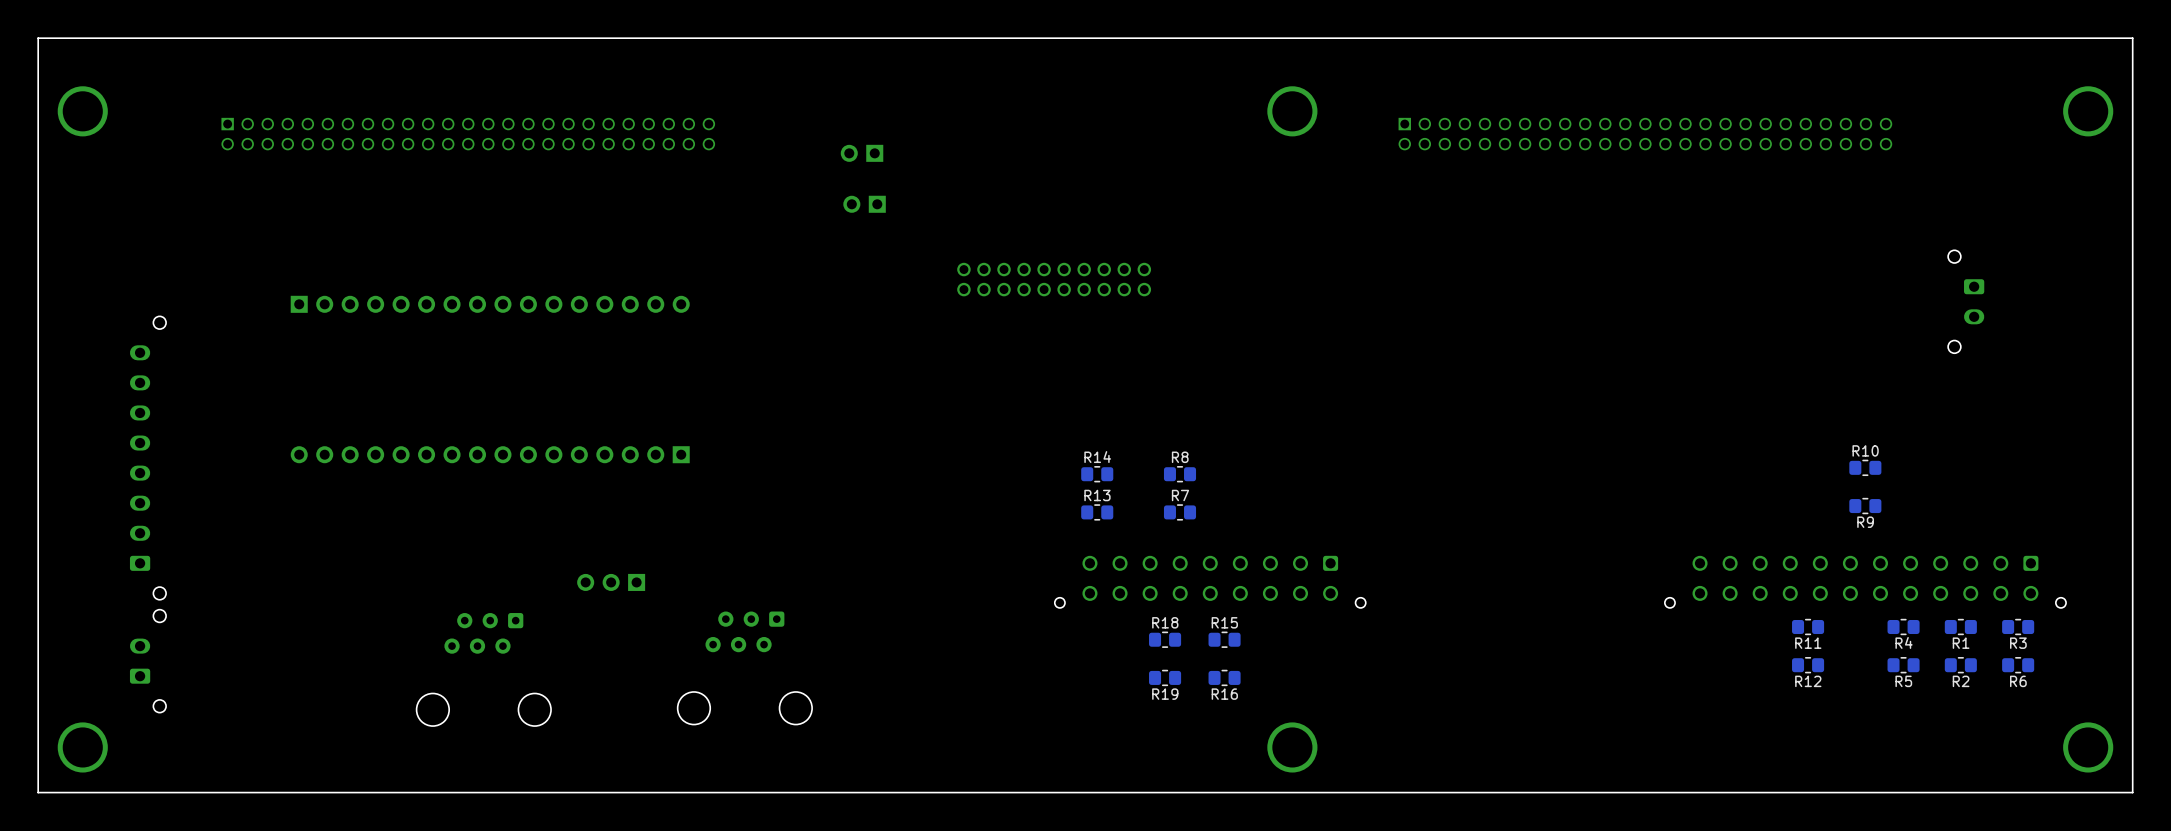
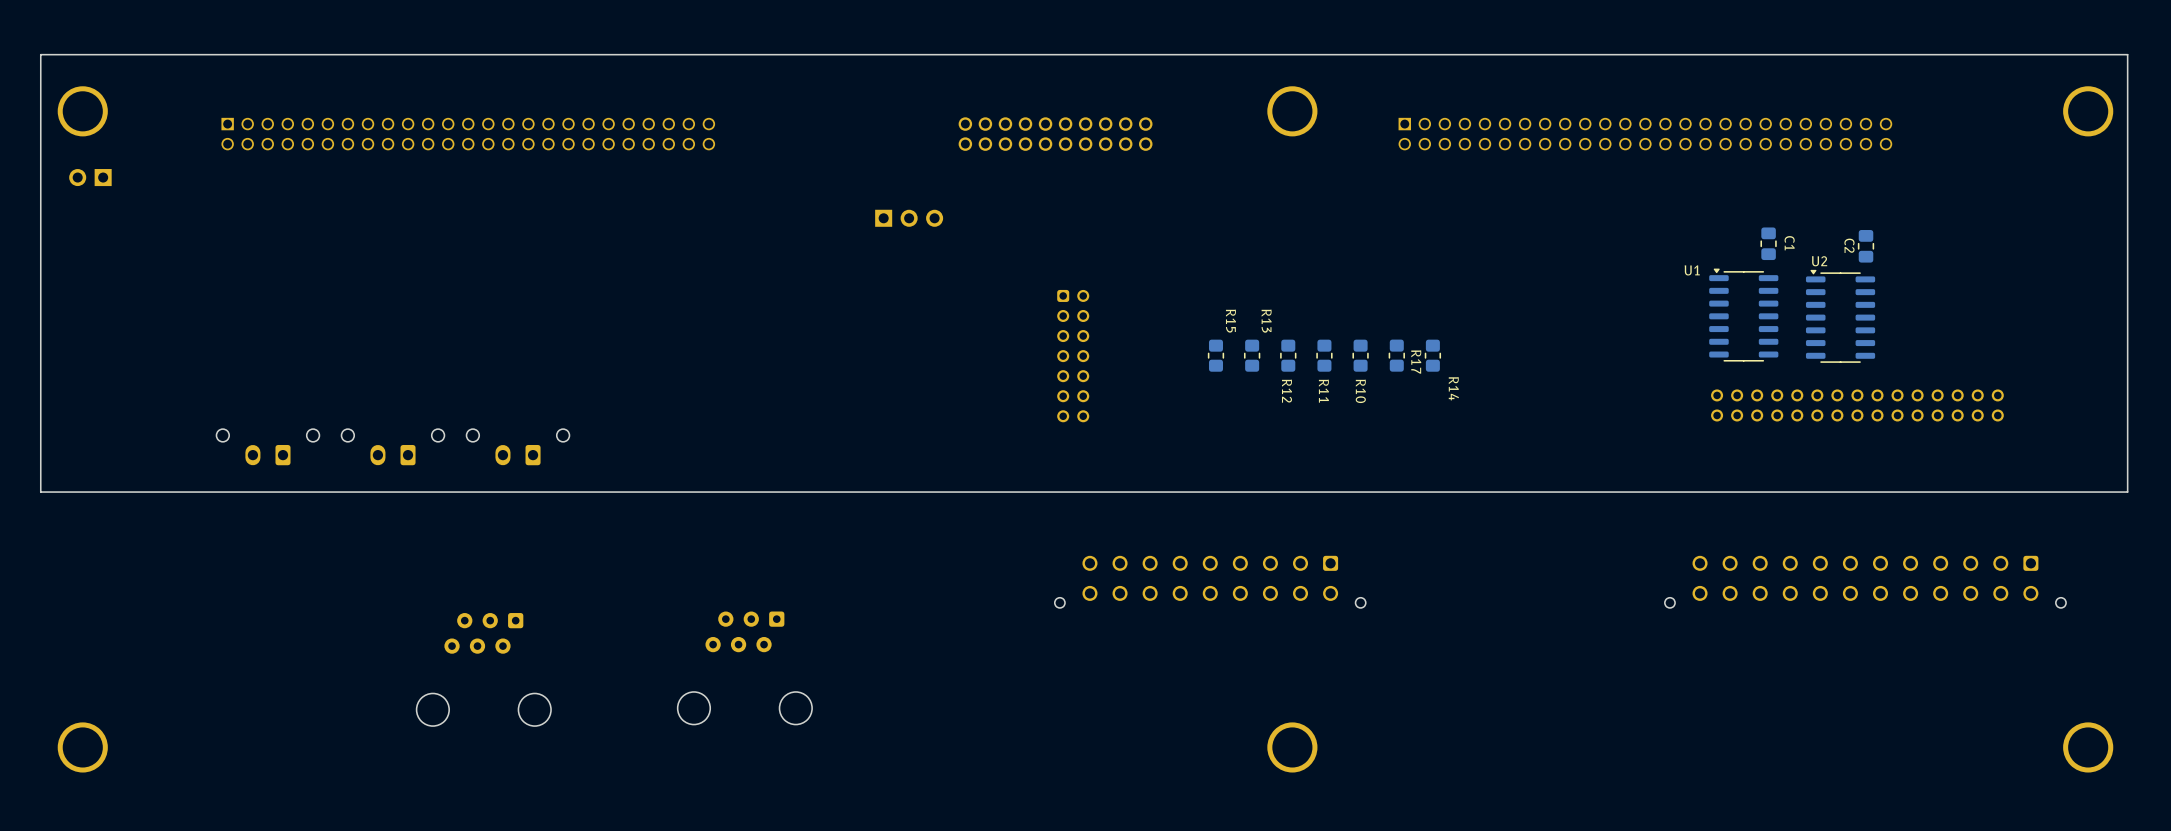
board edge: (2132, 38) (38, 38) (38, 792) (2132, 792) (2132, 38) -> (2127, 54) (2127, 492) (40, 492) (40, 54) (2127, 54)
part: (862, 153) -> none
part: none -> (90, 177)
part: (864, 204) -> none
part: none -> (909, 218)
C1: none -> (1768, 243)
C2: none -> (1866, 246)
part position: (1054, 279) -> (1055, 134)
part: (1966, 301) -> none
part: (490, 304) -> none
U1: none -> (1743, 315)
U2: none -> (1840, 316)
R17: none -> (1396, 355)
part: none -> (1073, 356)
part: none -> (1857, 405)
part: none -> (267, 447)
part: none -> (392, 447)
part: none -> (518, 447)
R10 name position: R10 (1865, 450) -> R10 (1360, 391)
part: (490, 454) -> none
R14 name position: R14 (1097, 457) -> R14 (1453, 388)
part: (148, 458) -> none
R10 rotation: 0° (1865, 467) -> 90° clockwise (1360, 355)
R10 position: (1865, 467) -> (1360, 355)
R14 rotation: 0° (1097, 474) -> 90° clockwise (1432, 355)
R14 position: (1097, 474) -> (1432, 355)
R8: (1180, 474) -> none
R13 name position: R13 (1097, 495) -> R13 (1266, 321)
R9: (1865, 506) -> none
R13 rotation: 0° (1097, 512) -> 90° clockwise (1252, 355)
R13 position: (1097, 512) -> (1252, 355)
R7: (1180, 512) -> none
part: (611, 582) -> none
R15 name position: R15 (1224, 622) -> R15 (1230, 321)
R11 rotation: 0° (1808, 627) -> 90° clockwise (1324, 355)
R11 position: (1808, 627) -> (1324, 355)
R4: (1903, 627) -> none
R1: (1960, 627) -> none
R3: (2018, 627) -> none
R18: (1165, 639) -> none
R15 rotation: 0° (1224, 639) -> 90° clockwise (1215, 355)
R15 position: (1224, 639) -> (1215, 355)
part: (148, 661) -> none
R12 rotation: 0° (1808, 665) -> 90° clockwise (1288, 355)
R12 position: (1808, 665) -> (1288, 355)
R5: (1903, 665) -> none
R2: (1960, 665) -> none
R6: (2018, 665) -> none
R19: (1165, 677) -> none
R16: (1224, 677) -> none

